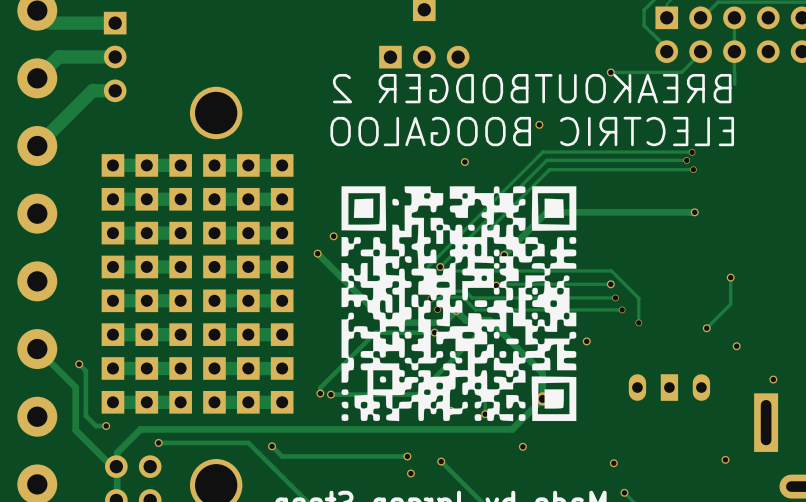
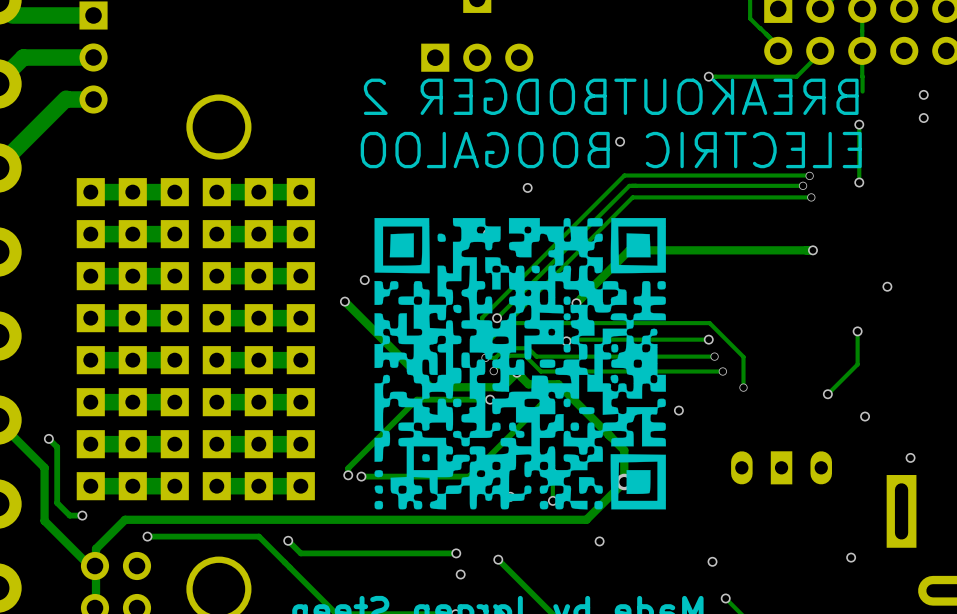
via: none -> (923, 94)
via: none -> (923, 118)
track: none -> (859, 124) (859, 182)
via: none -> (859, 124)
via: none -> (859, 182)
via: none -> (887, 286)

